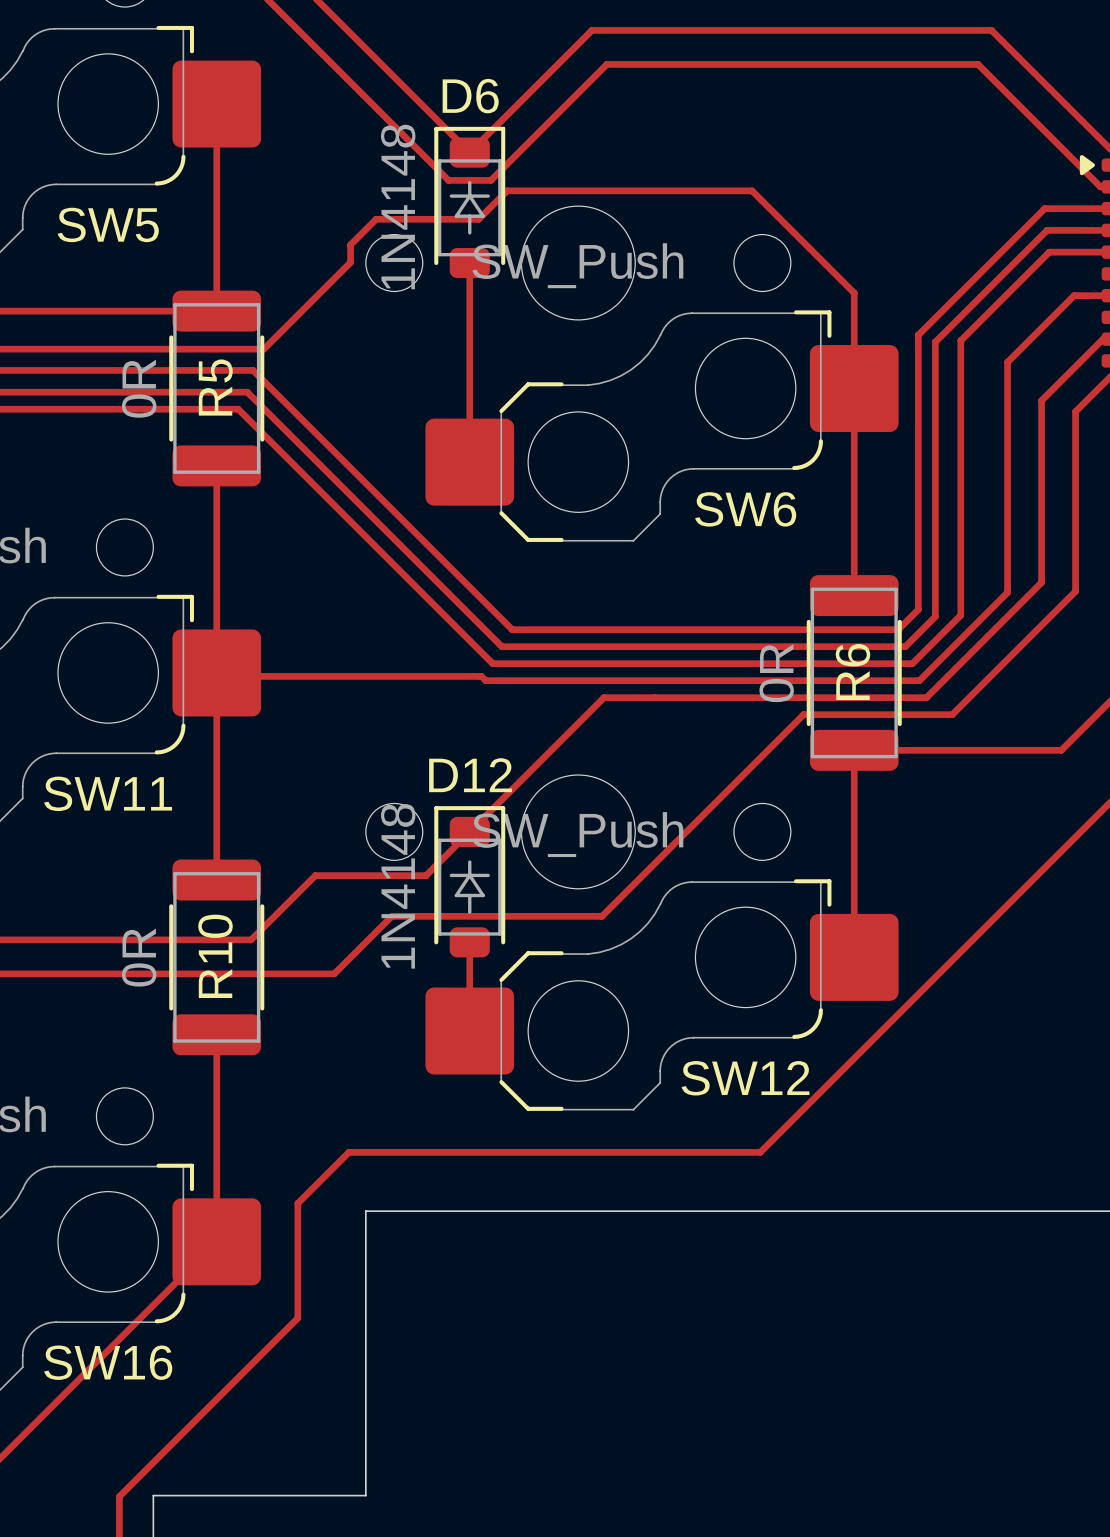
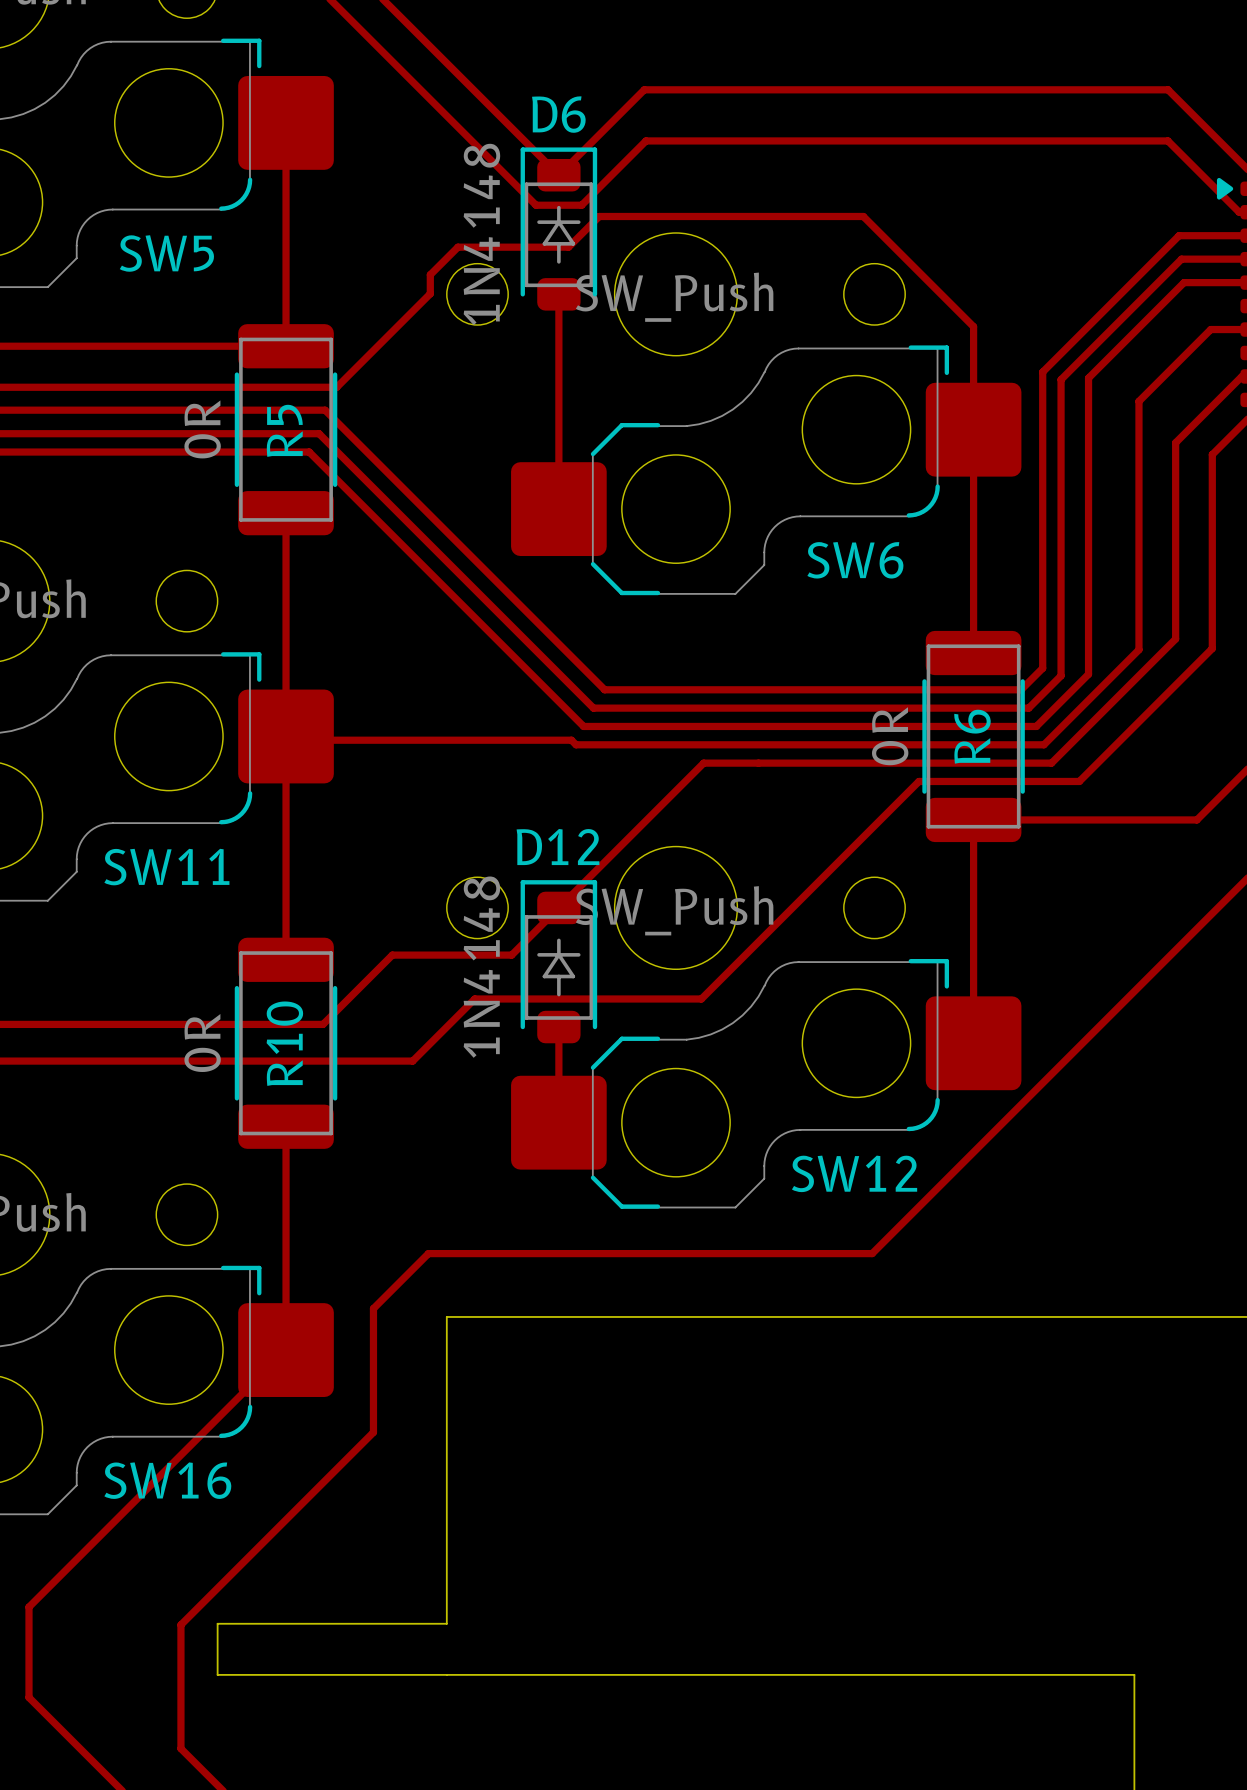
top track: (548, 73) (591, 30) (991, 30) (1034, 73) -> (644, 89) (1168, 89)
top track: (550, 120) (606, 64) (978, 64) (1034, 120) -> (645, 140) (1167, 140)

